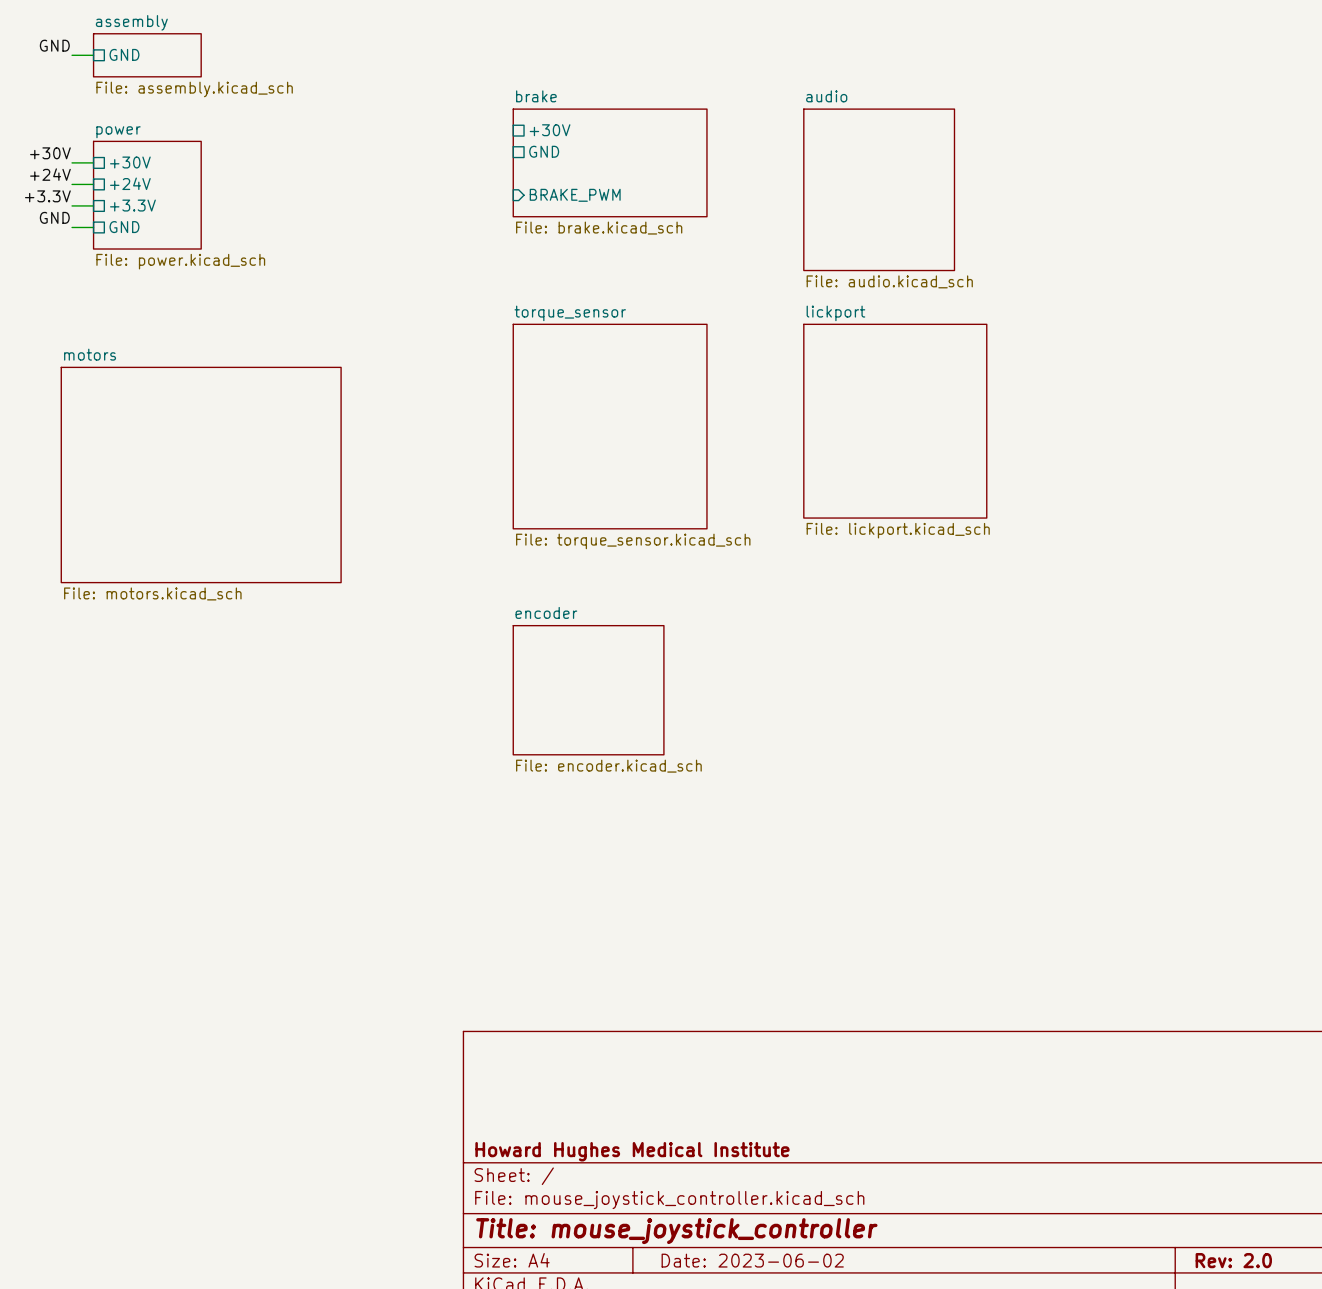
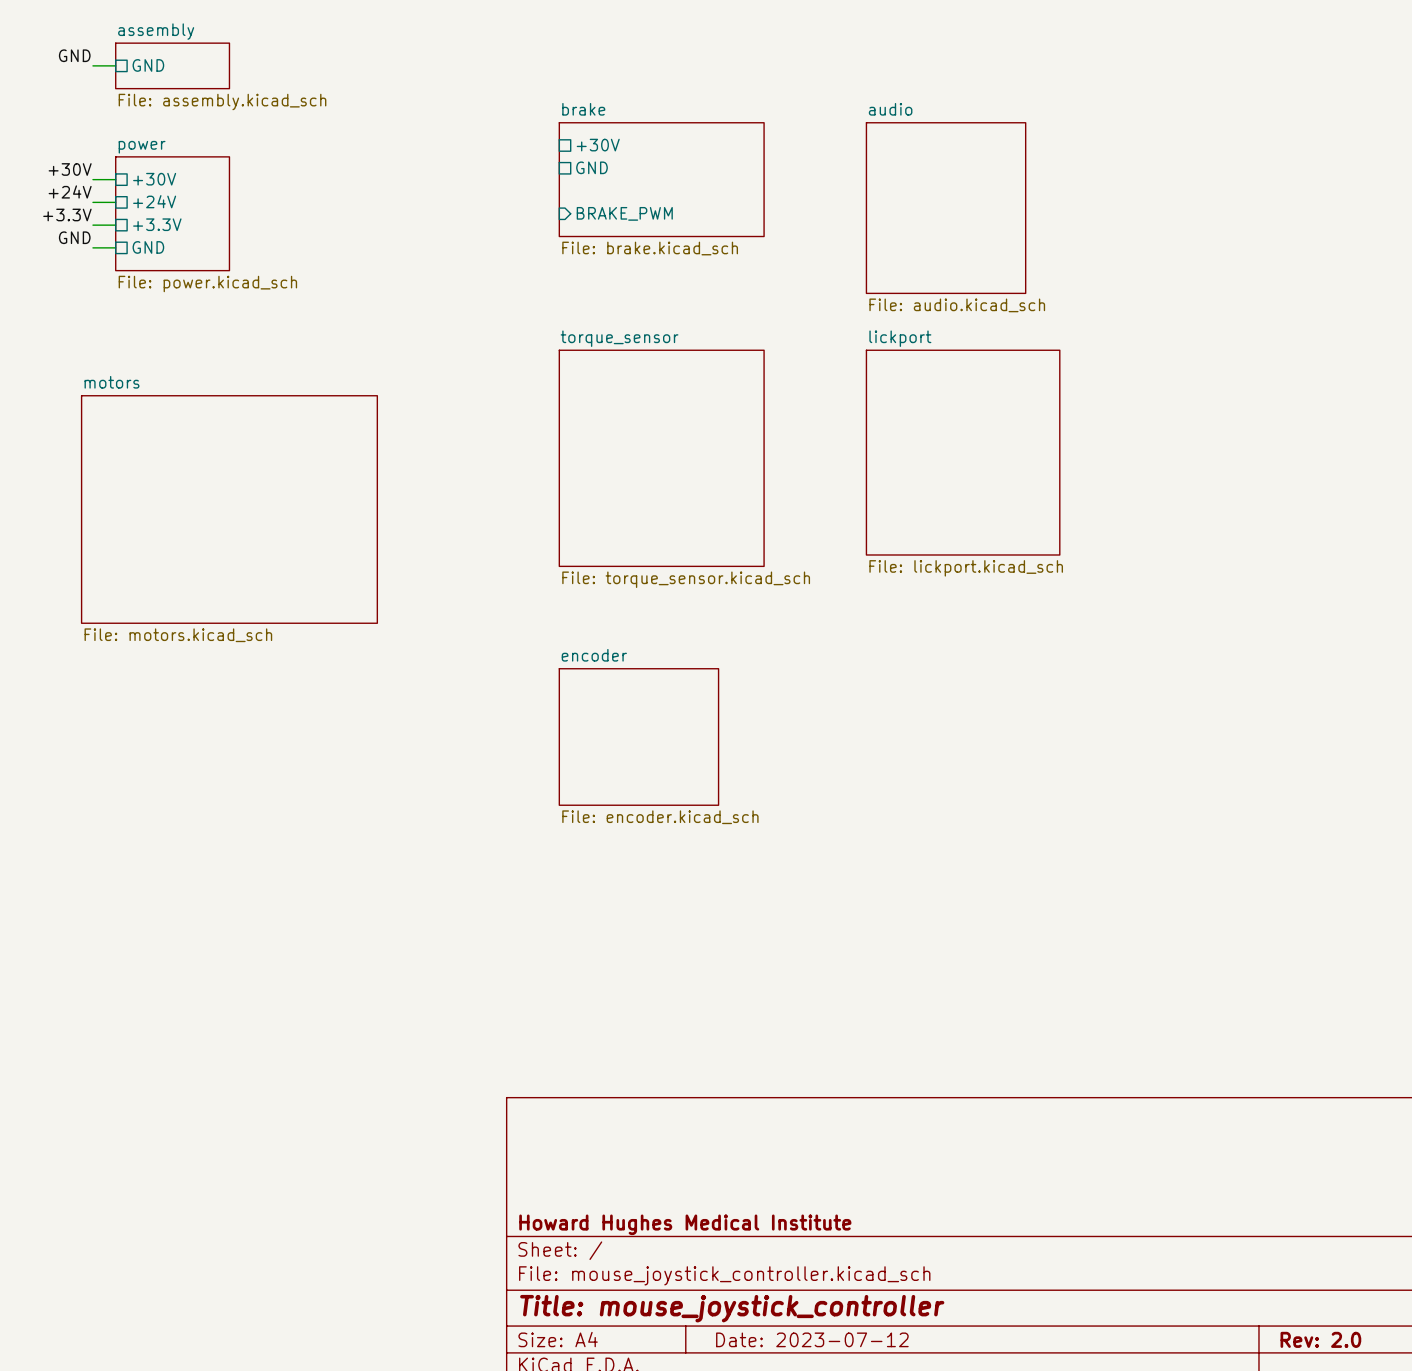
title block: Date: 2023-06-02 (752, 1260) -> Date: 2023-07-12 (812, 1339)

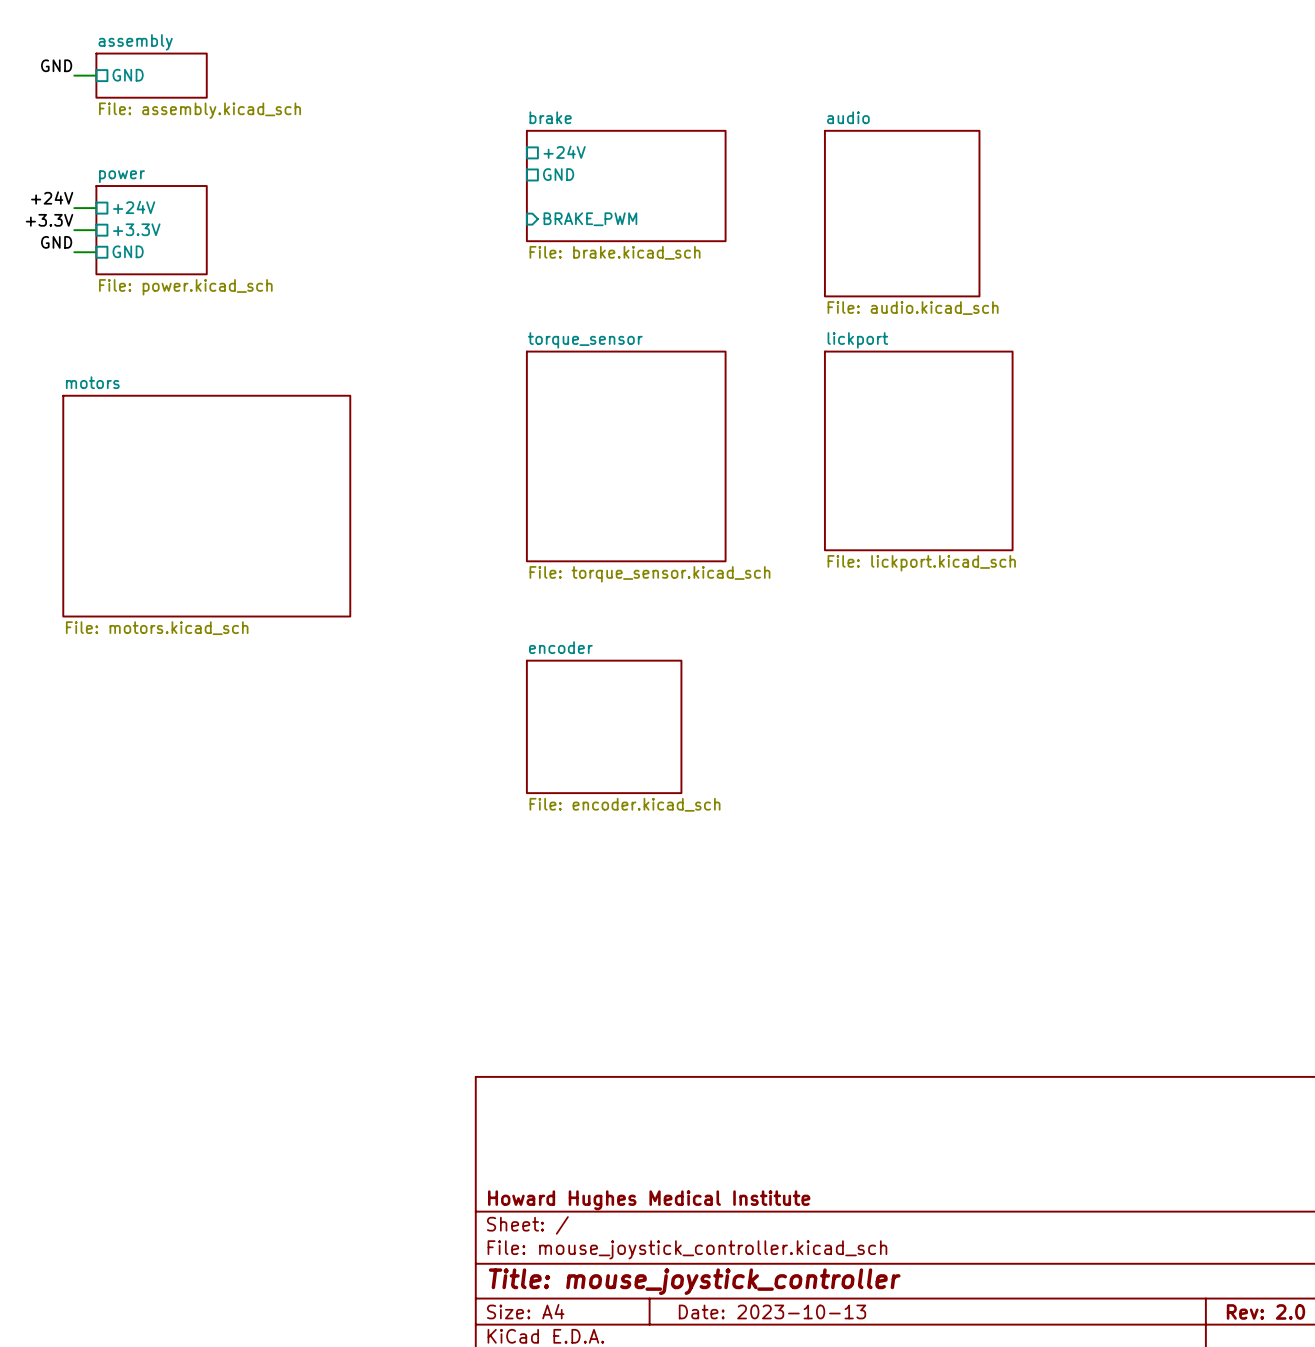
sheet pin: +30V (598, 145) -> +24V (564, 152)
label: +30V (70, 169) -> none
wire: (92, 179) (115, 179) -> none
sheet pin: +30V (154, 179) -> none
sheet power: File: power.kicad_sch (172, 213) -> none
sheet power: none -> File: power.kicad_sch (151, 230)
title block: Date: 2023-07-12 (812, 1339) -> Date: 2023-10-13 (772, 1311)

